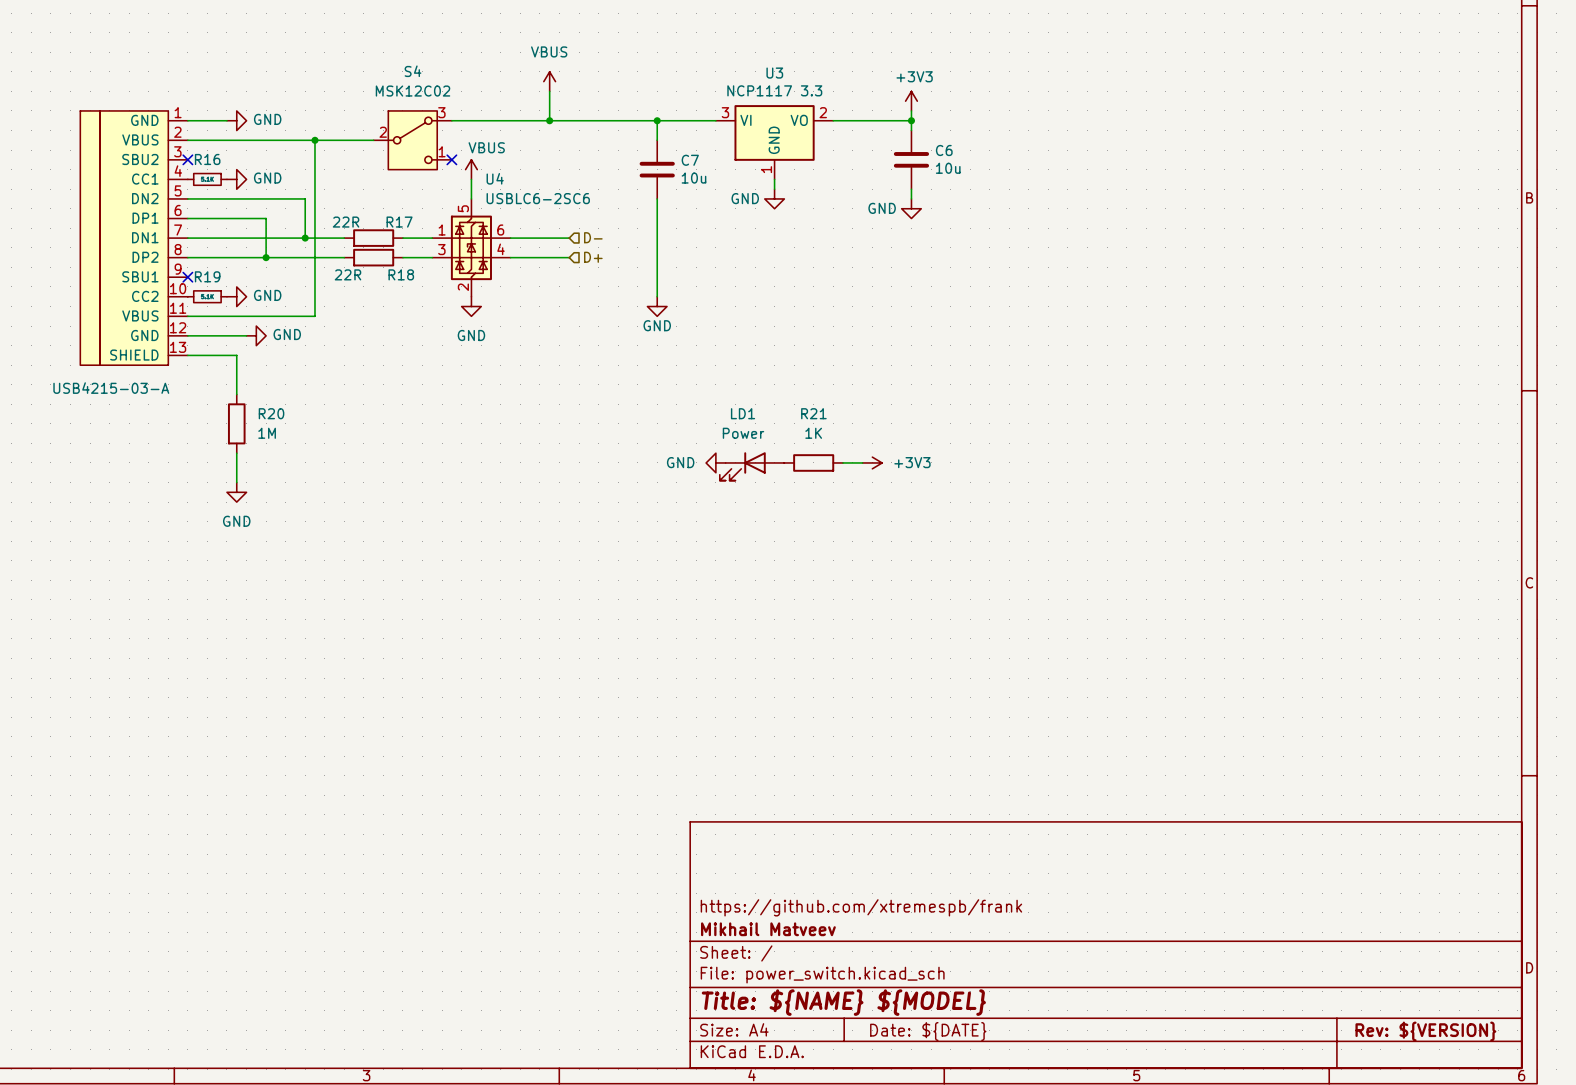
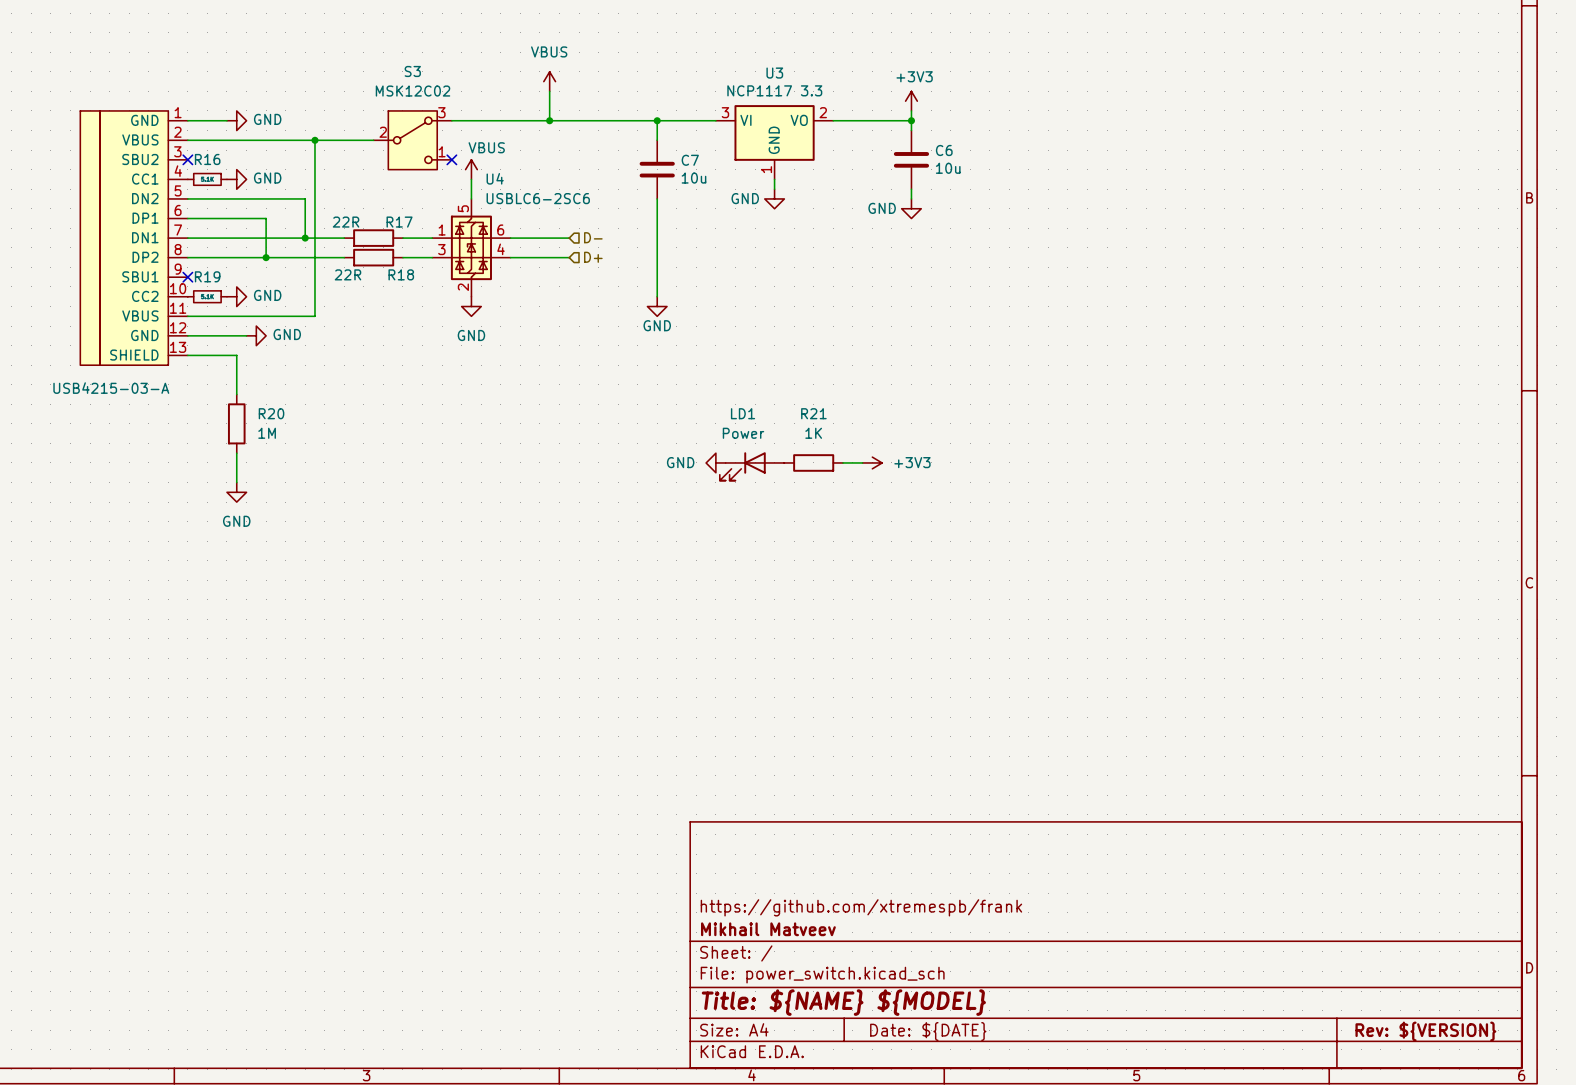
S4 name: S4 (413, 71) -> S3 (412, 71)

